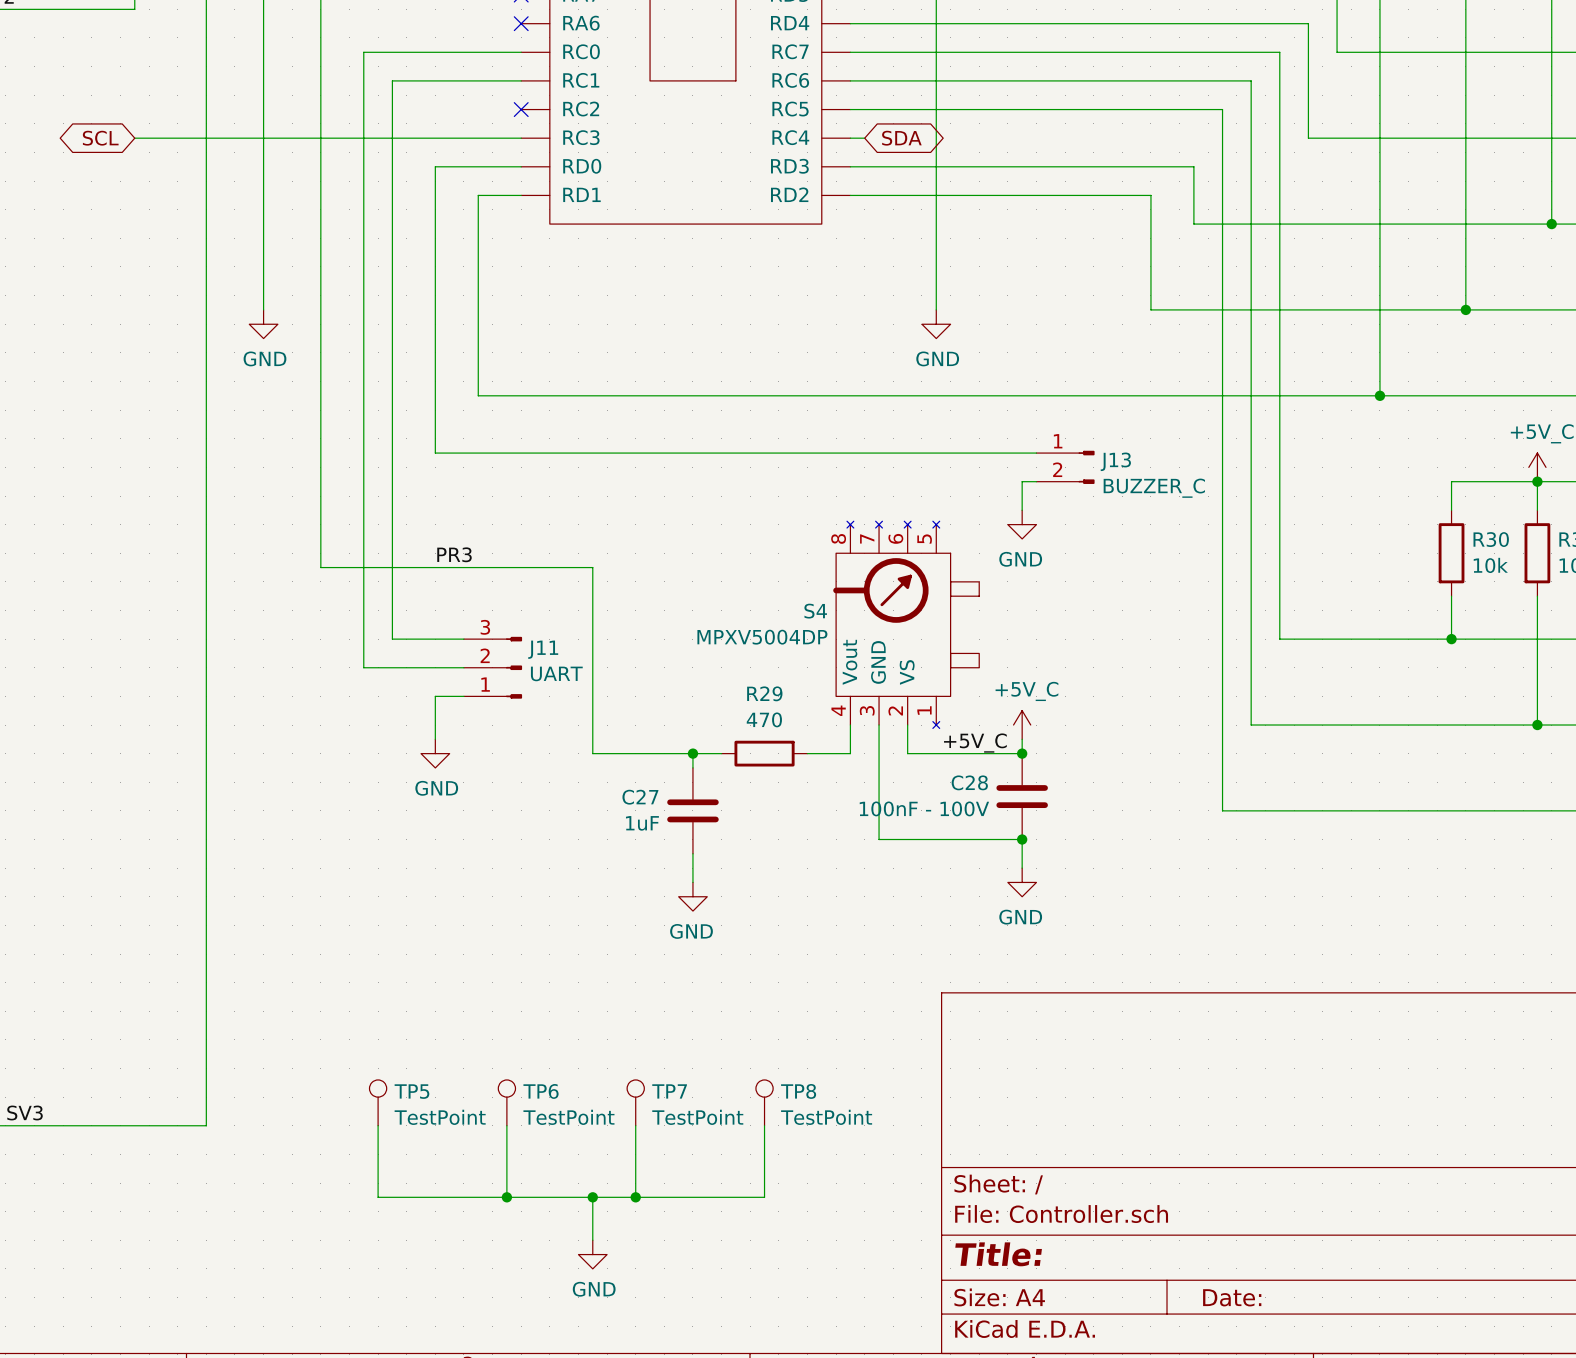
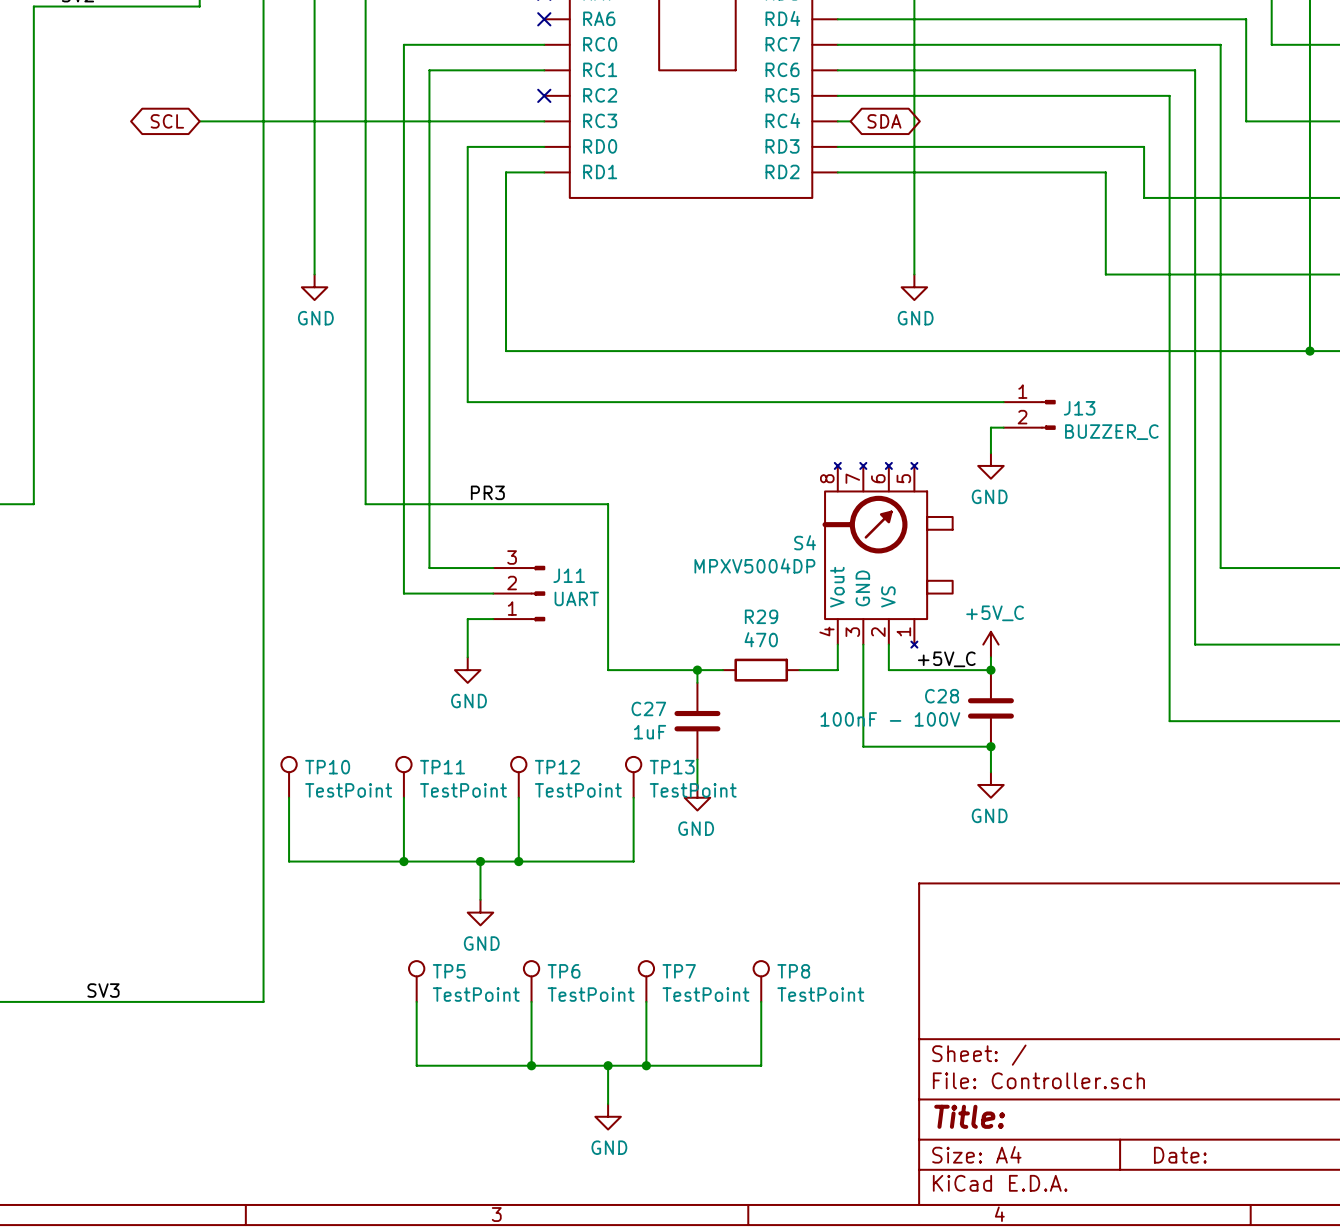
TP10: none -> TestPoint (289, 777)
TP11: none -> TestPoint (403, 777)
TP12: none -> TestPoint (518, 777)
TP13: none -> TestPoint (633, 777)
wire: none -> (289, 797) (289, 861) (633, 861) (633, 797)
wire: none -> (403, 797) (403, 861)
wire: none -> (518, 797) (518, 861)
junction: none -> (403, 861)
wire: none -> (480, 861) (480, 899)
junction: none -> (480, 861)
junction: none -> (518, 861)
power symbol: none -> GND (480, 912)

